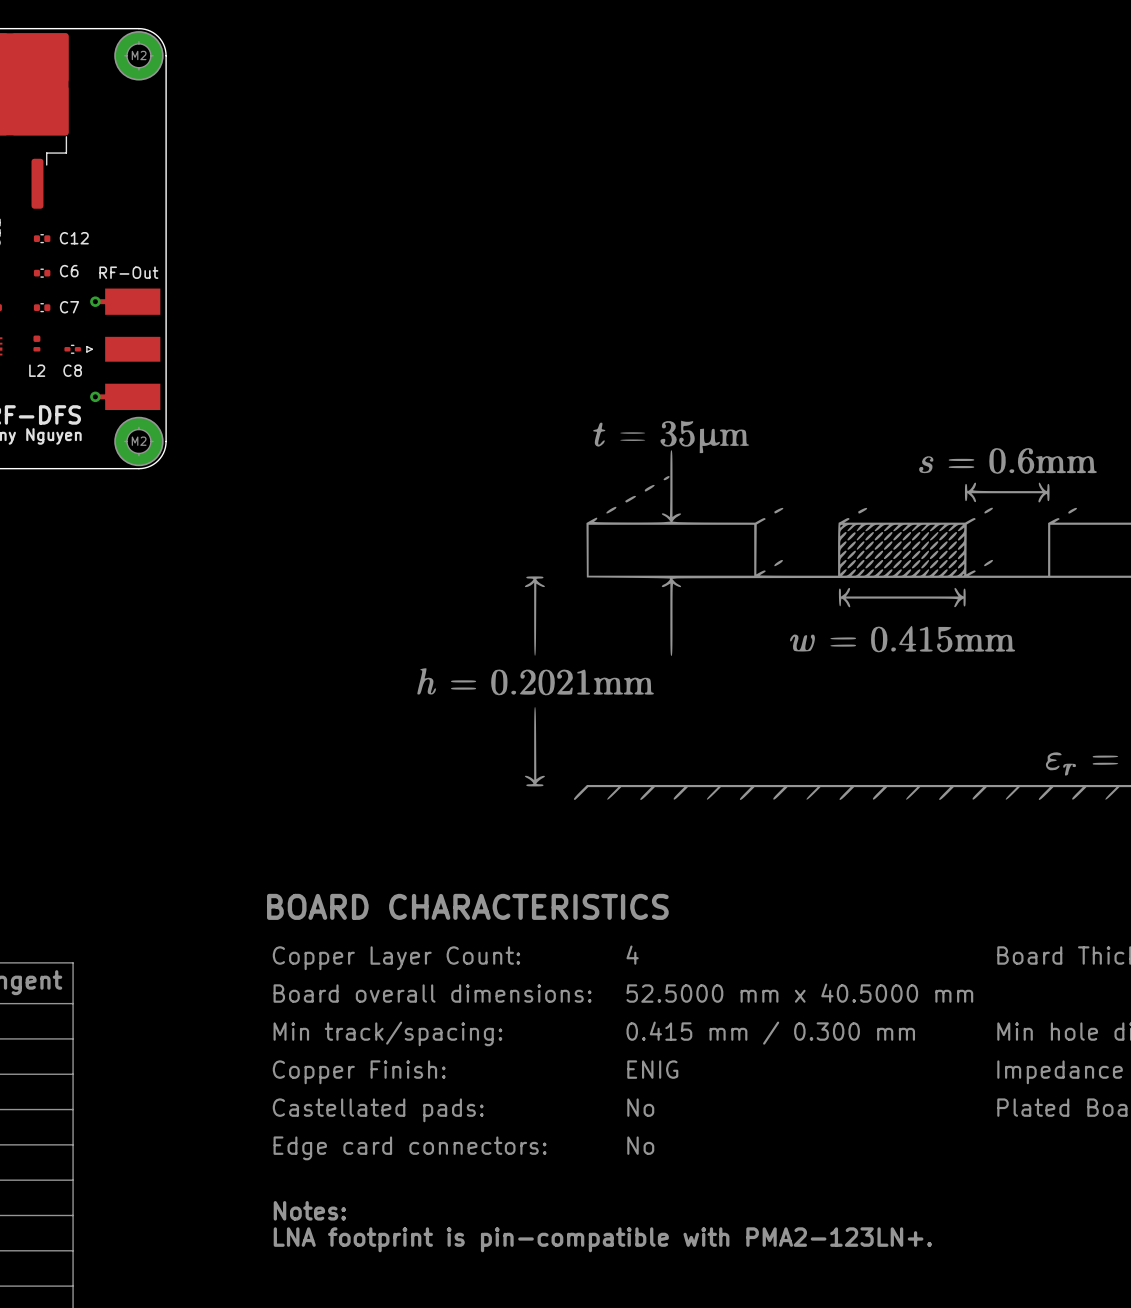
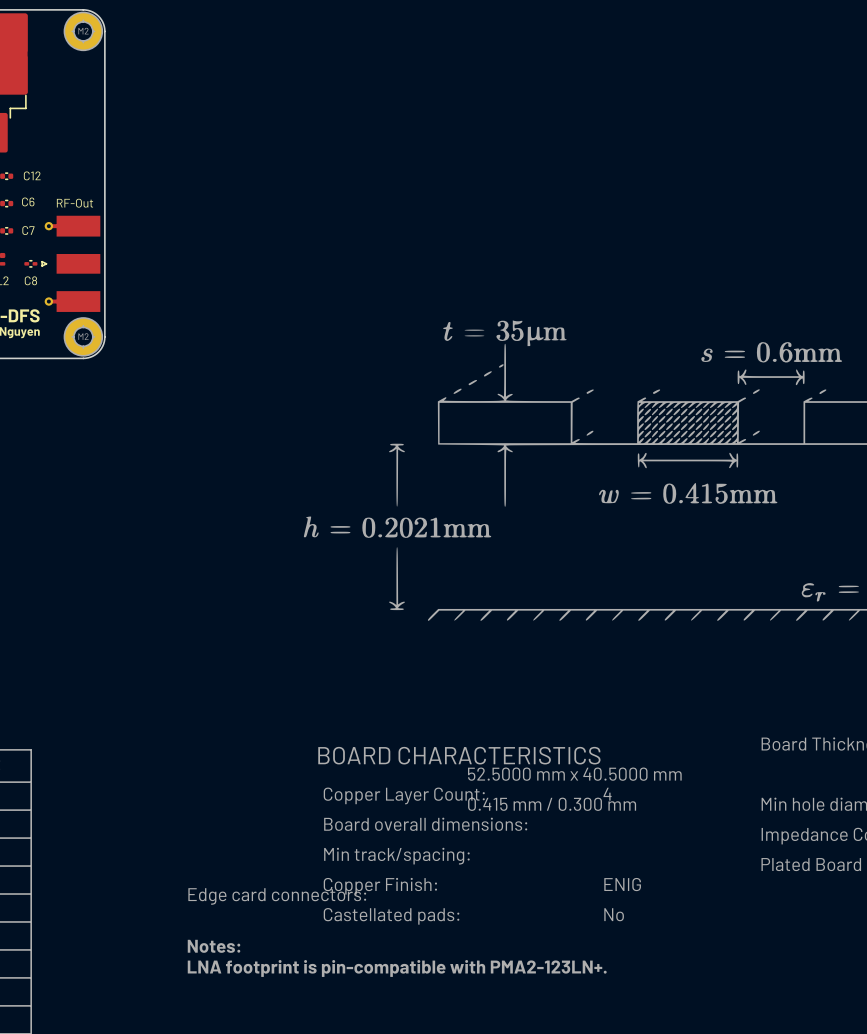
text position: BOARD CHARACTERISTICS (467, 906) -> BOARD CHARACTERISTICS (459, 755)
text position: 4 (632, 955) -> 4 (607, 794)
text position: Copper Layer Count: (396, 958) -> Copper Layer Count: (404, 795)
text position: Board overall dimensions: (432, 993) -> Board overall dimensions: (425, 824)
text position: Min track/spacing: (387, 1033) -> Min track/spacing: (396, 856)
text position: ENIG (652, 1069) -> ENIG (622, 884)
text position: Copper Finish: (359, 1072) -> Copper Finish: (380, 886)
text: No (640, 1107) -> none
text position: Castellated pads: (378, 1110) -> Castellated pads: (391, 916)
text: No (640, 1145) -> none
text: none -> No (614, 914)

